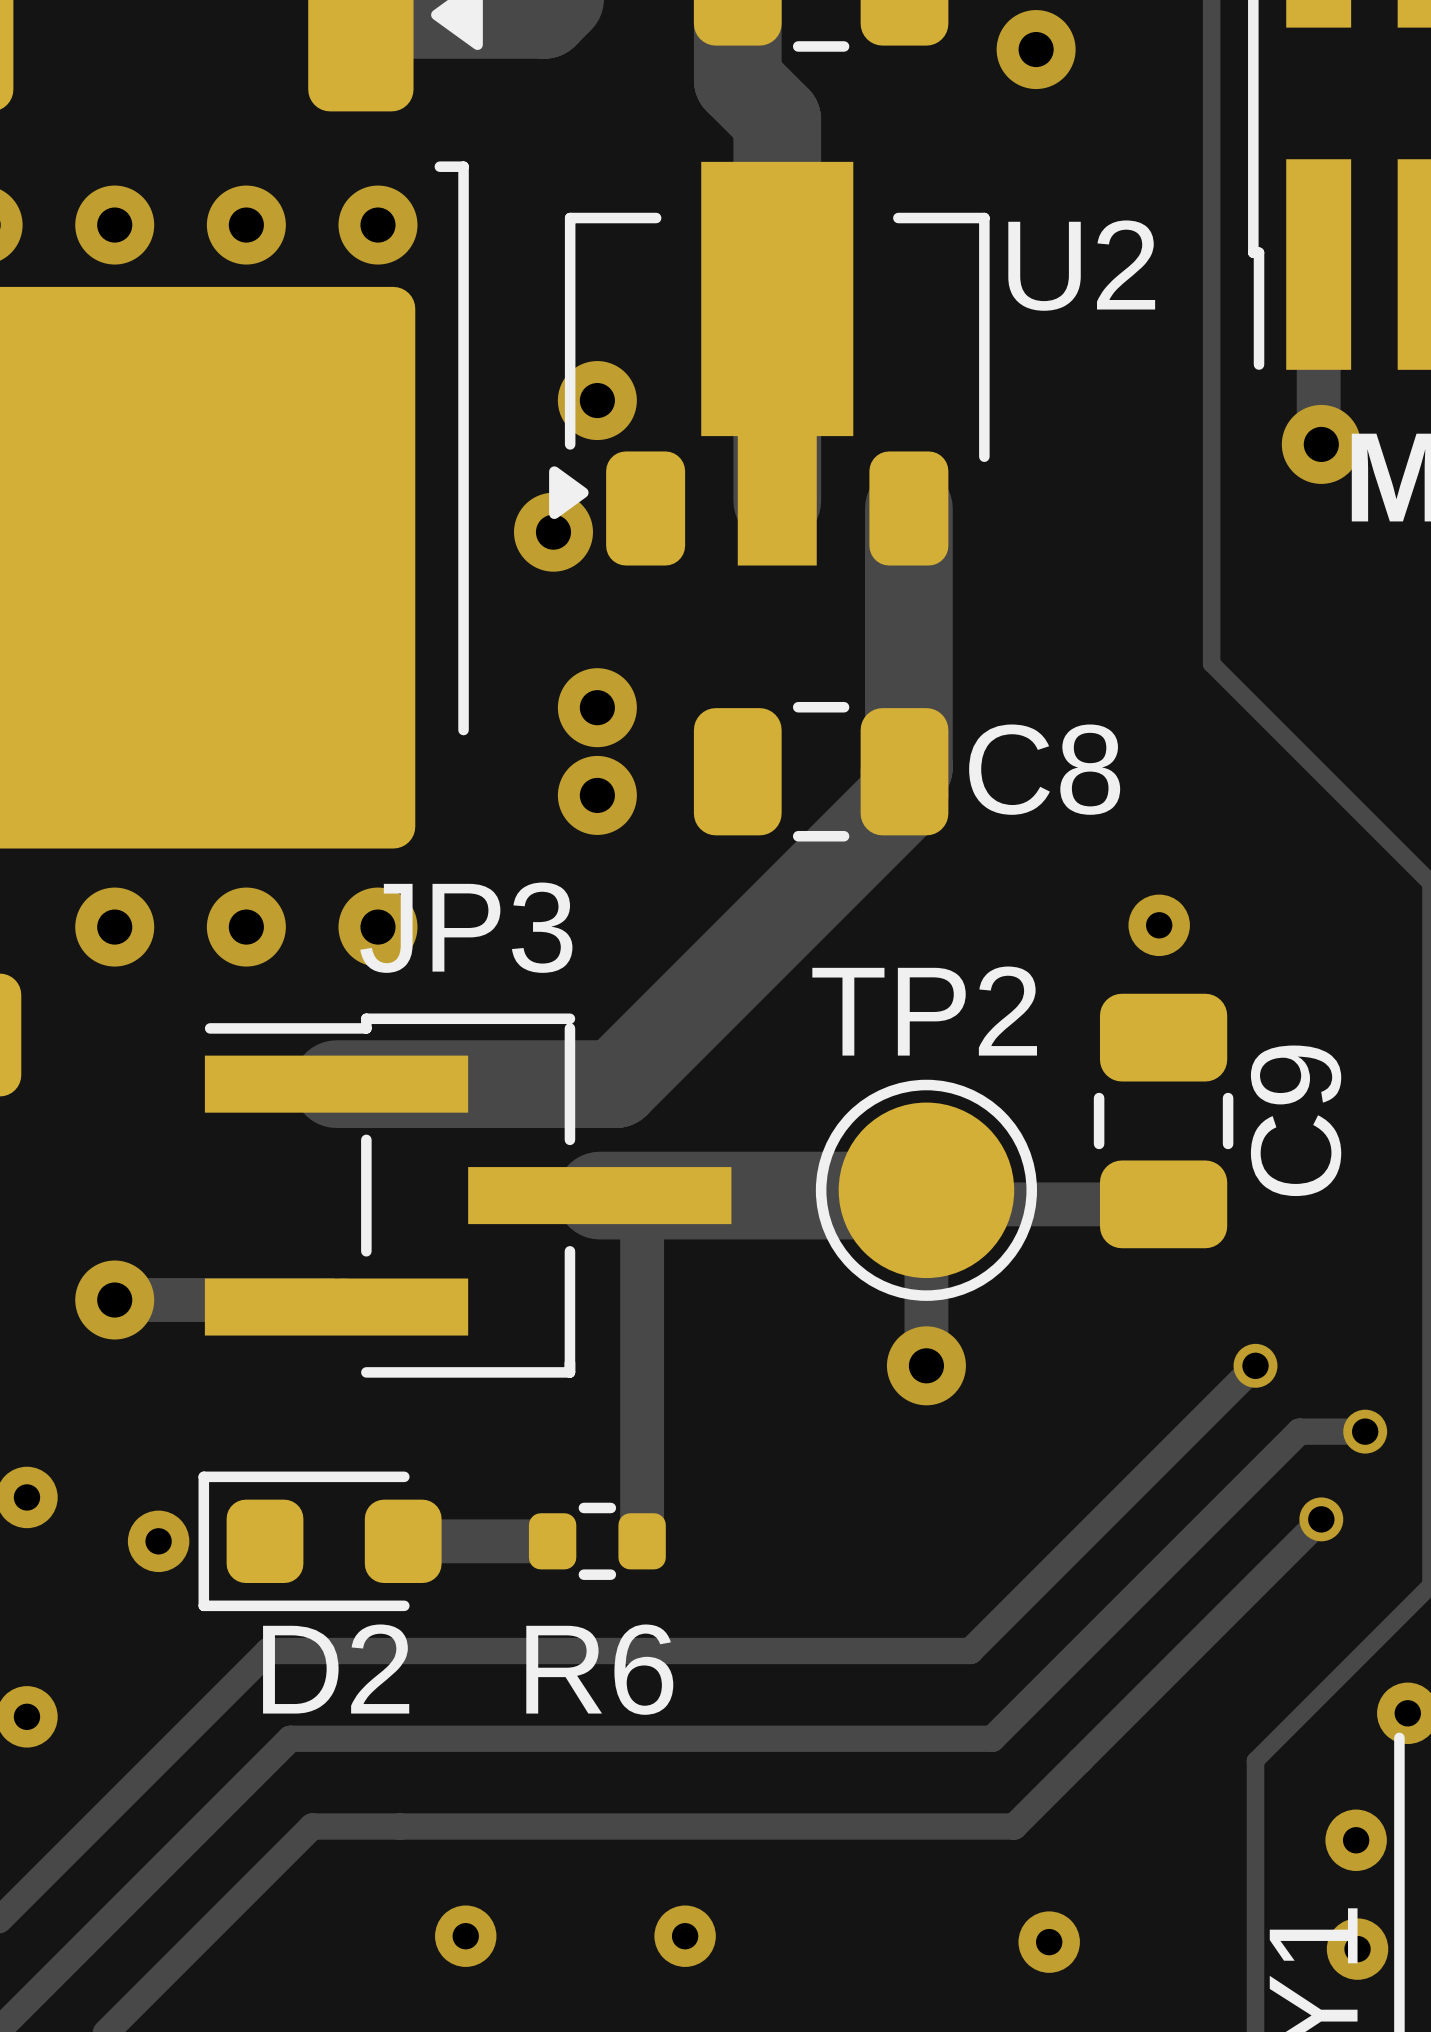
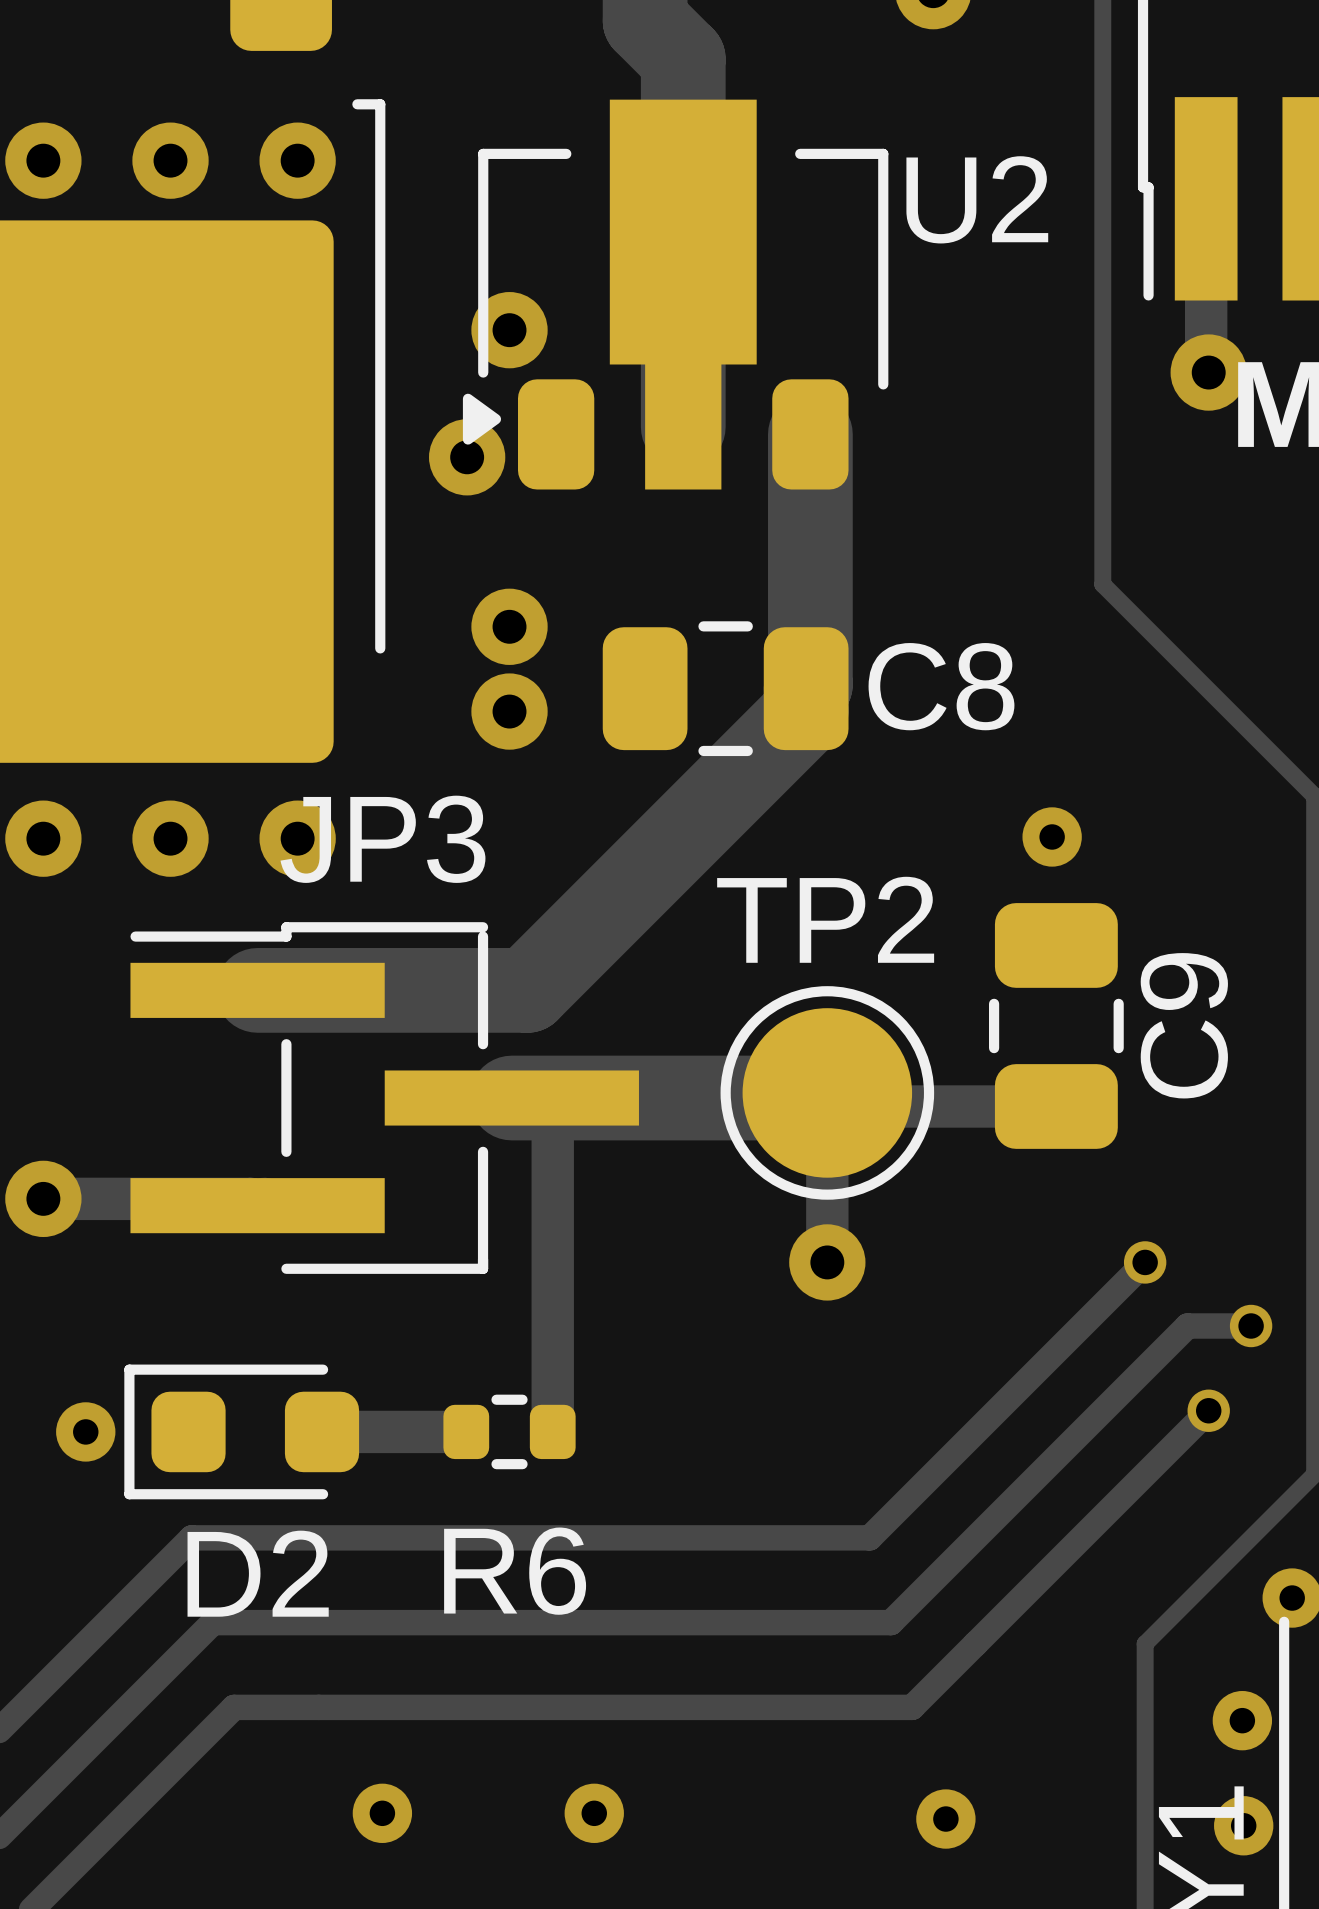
D2 name position: D2 (336, 1669) -> D2 (258, 1573)
R6 name position: R6 (599, 1669) -> R6 (515, 1571)

